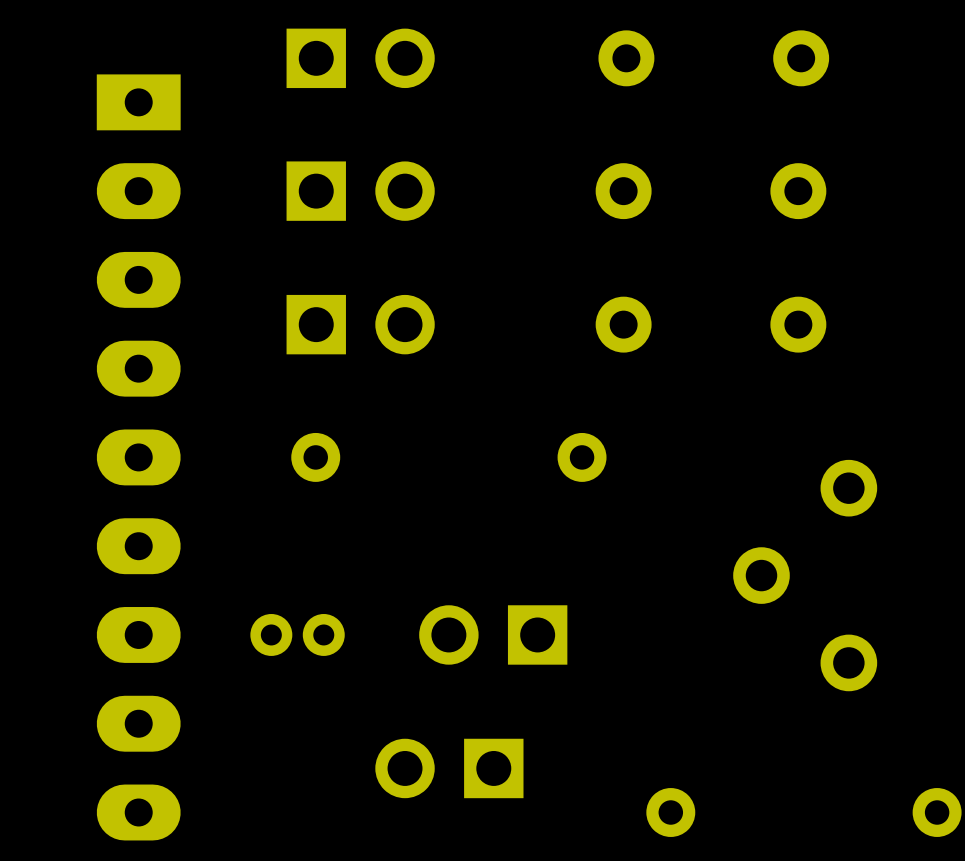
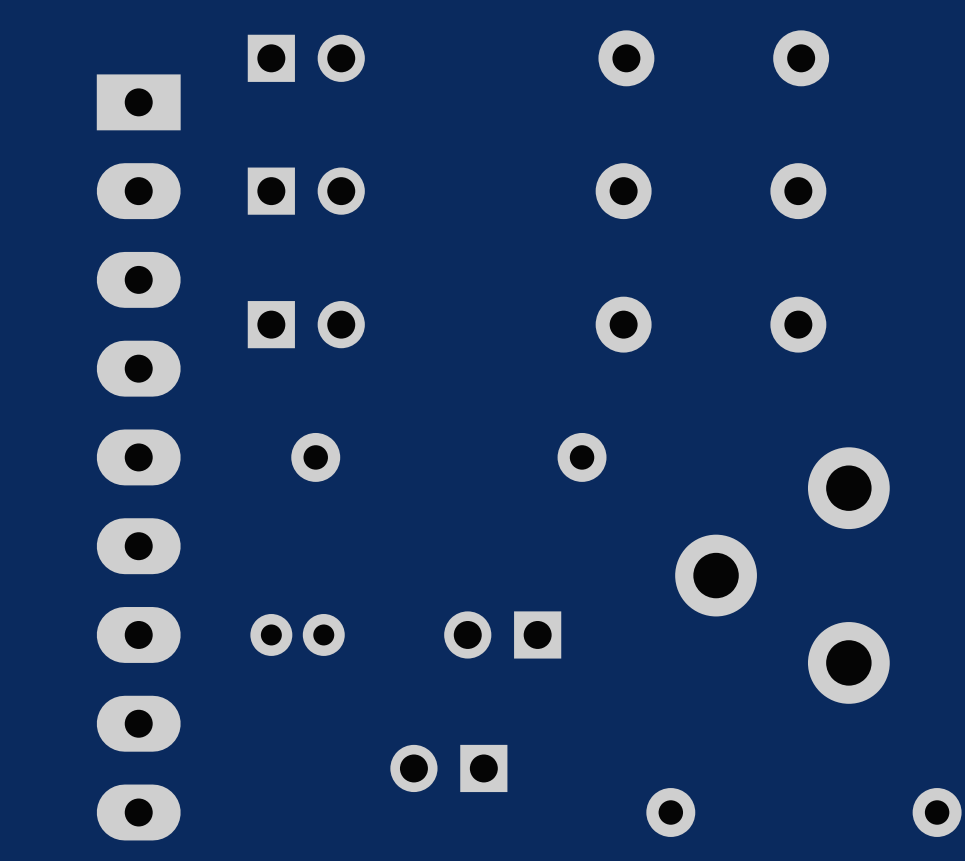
part: none -> (306, 58)
part: (360, 58) -> none
part: none -> (306, 191)
part: (360, 191) -> none
part: none -> (306, 324)
part: (360, 324) -> none
part footprint: [733, 459, 878, 692] -> [675, 447, 890, 704]
part footprint: [419, 605, 568, 665] -> [444, 611, 562, 659]
part footprint: [375, 738, 524, 799] -> [390, 744, 508, 793]

